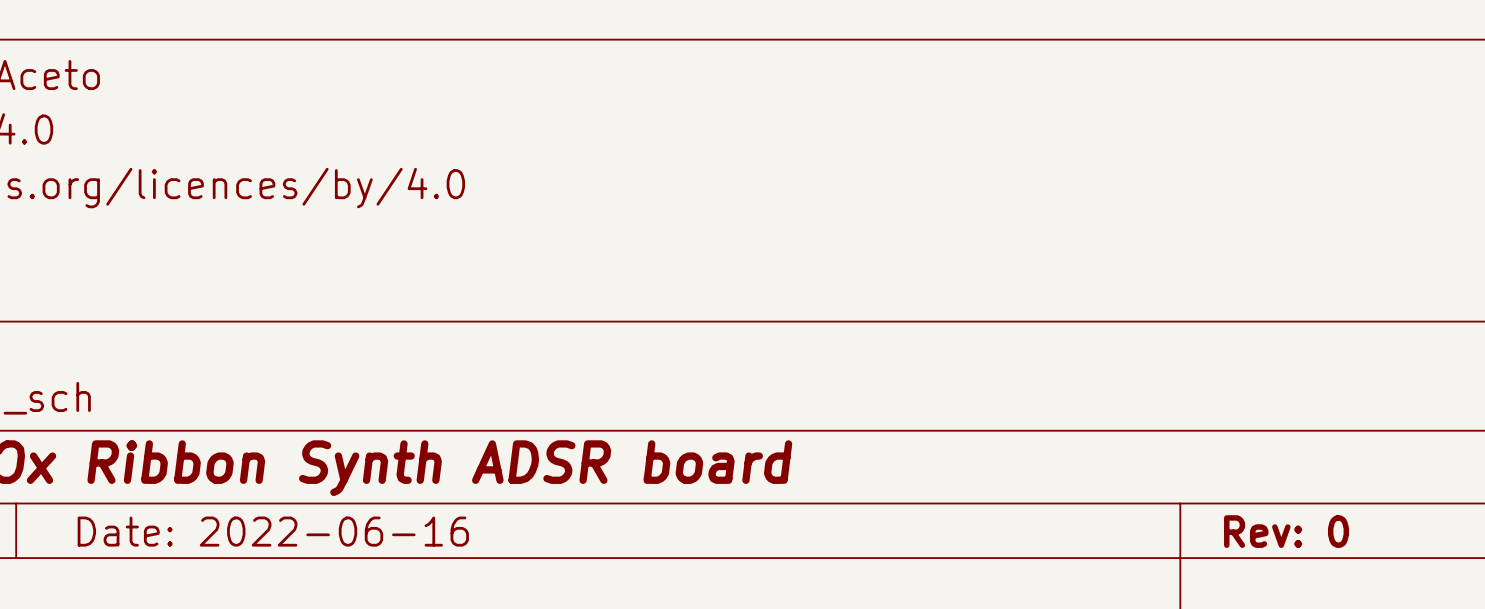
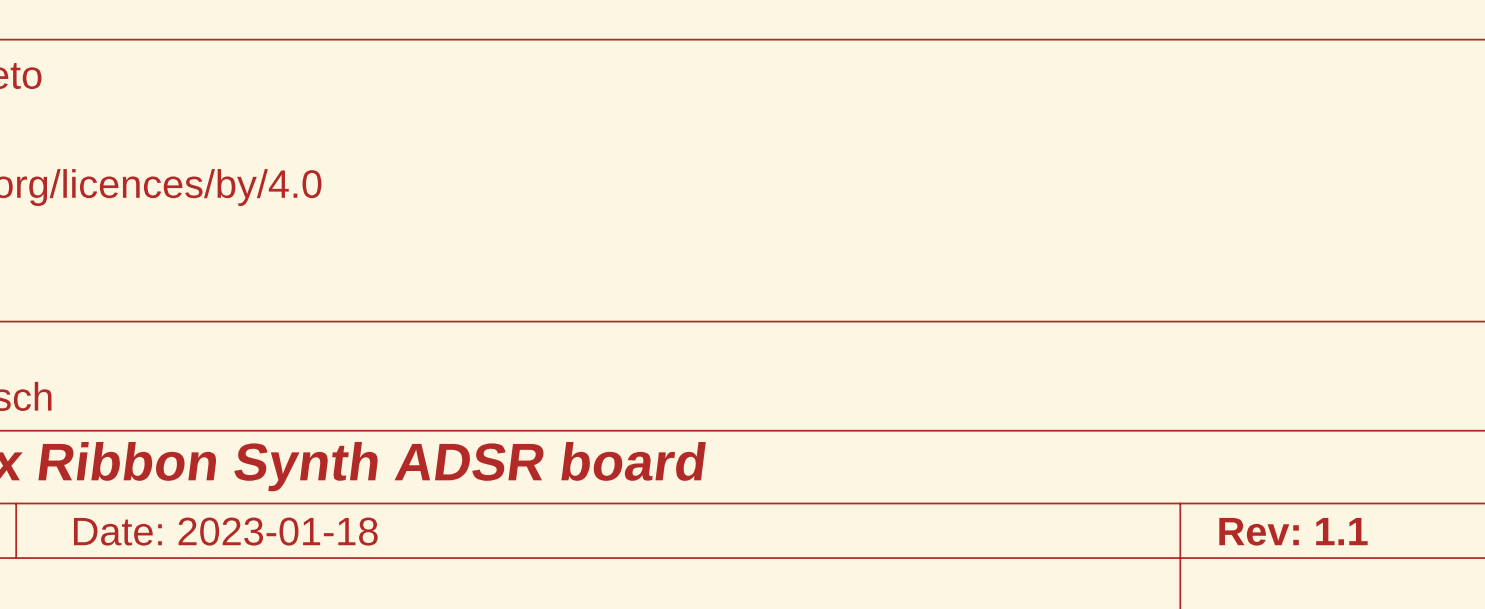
title block: Date: 2022-06-16 (273, 531) -> Date: 2023-01-18 (225, 531)
title block: Rev: 0 (1286, 531) -> Rev: 1.1 (1293, 531)

